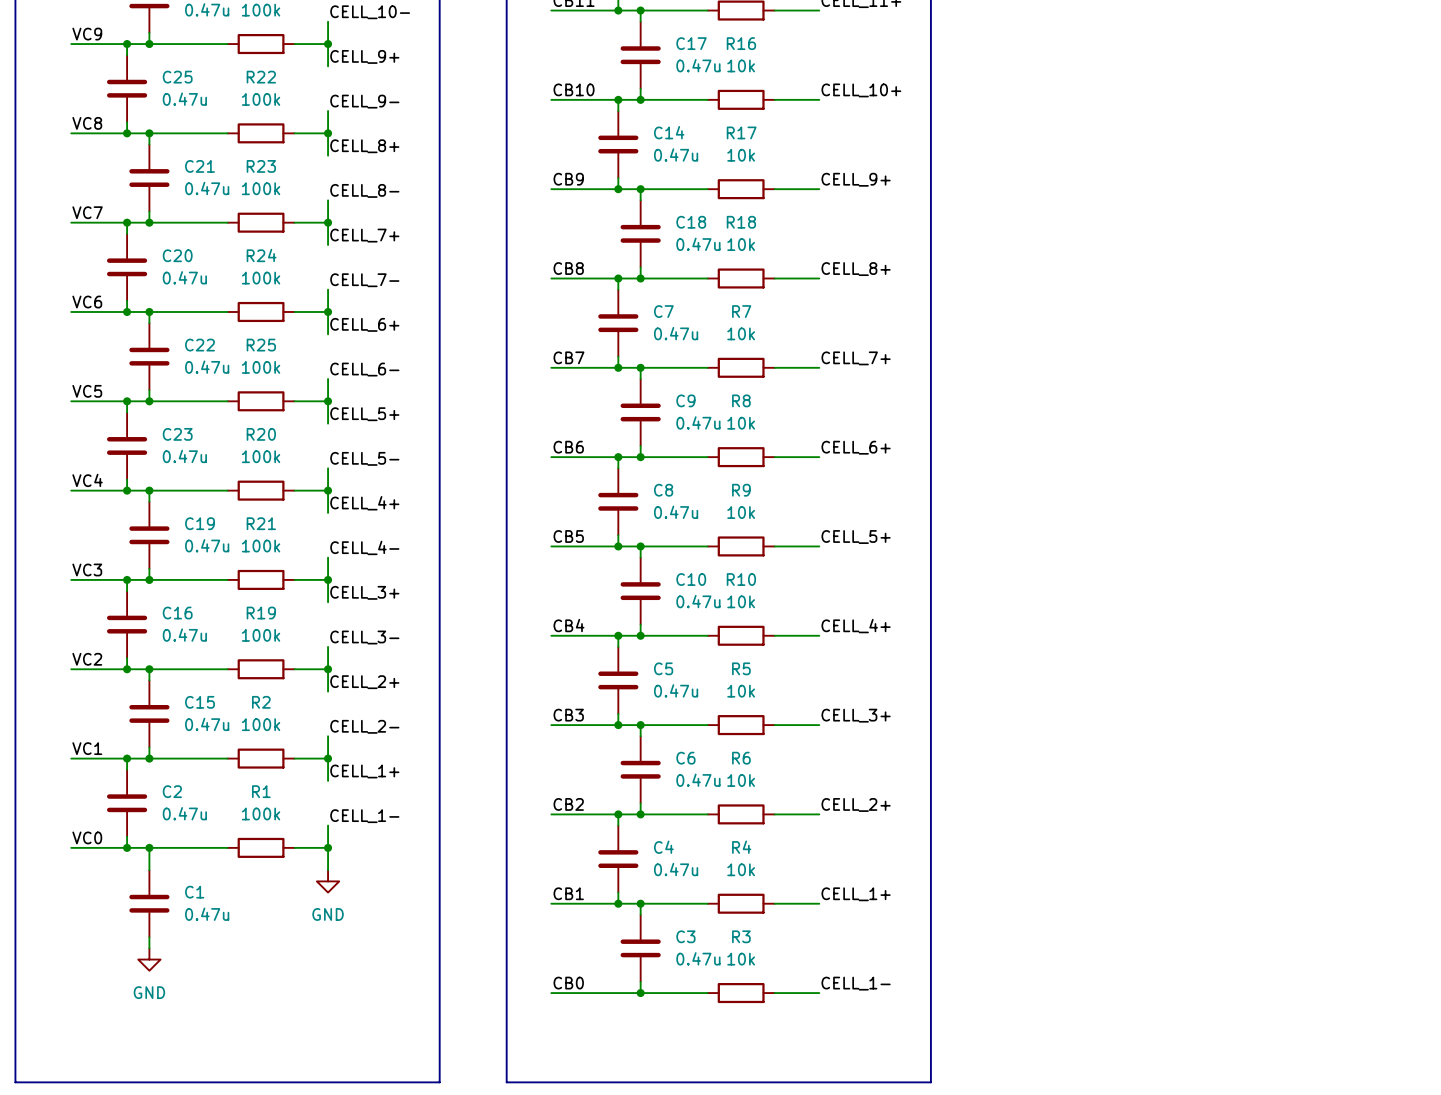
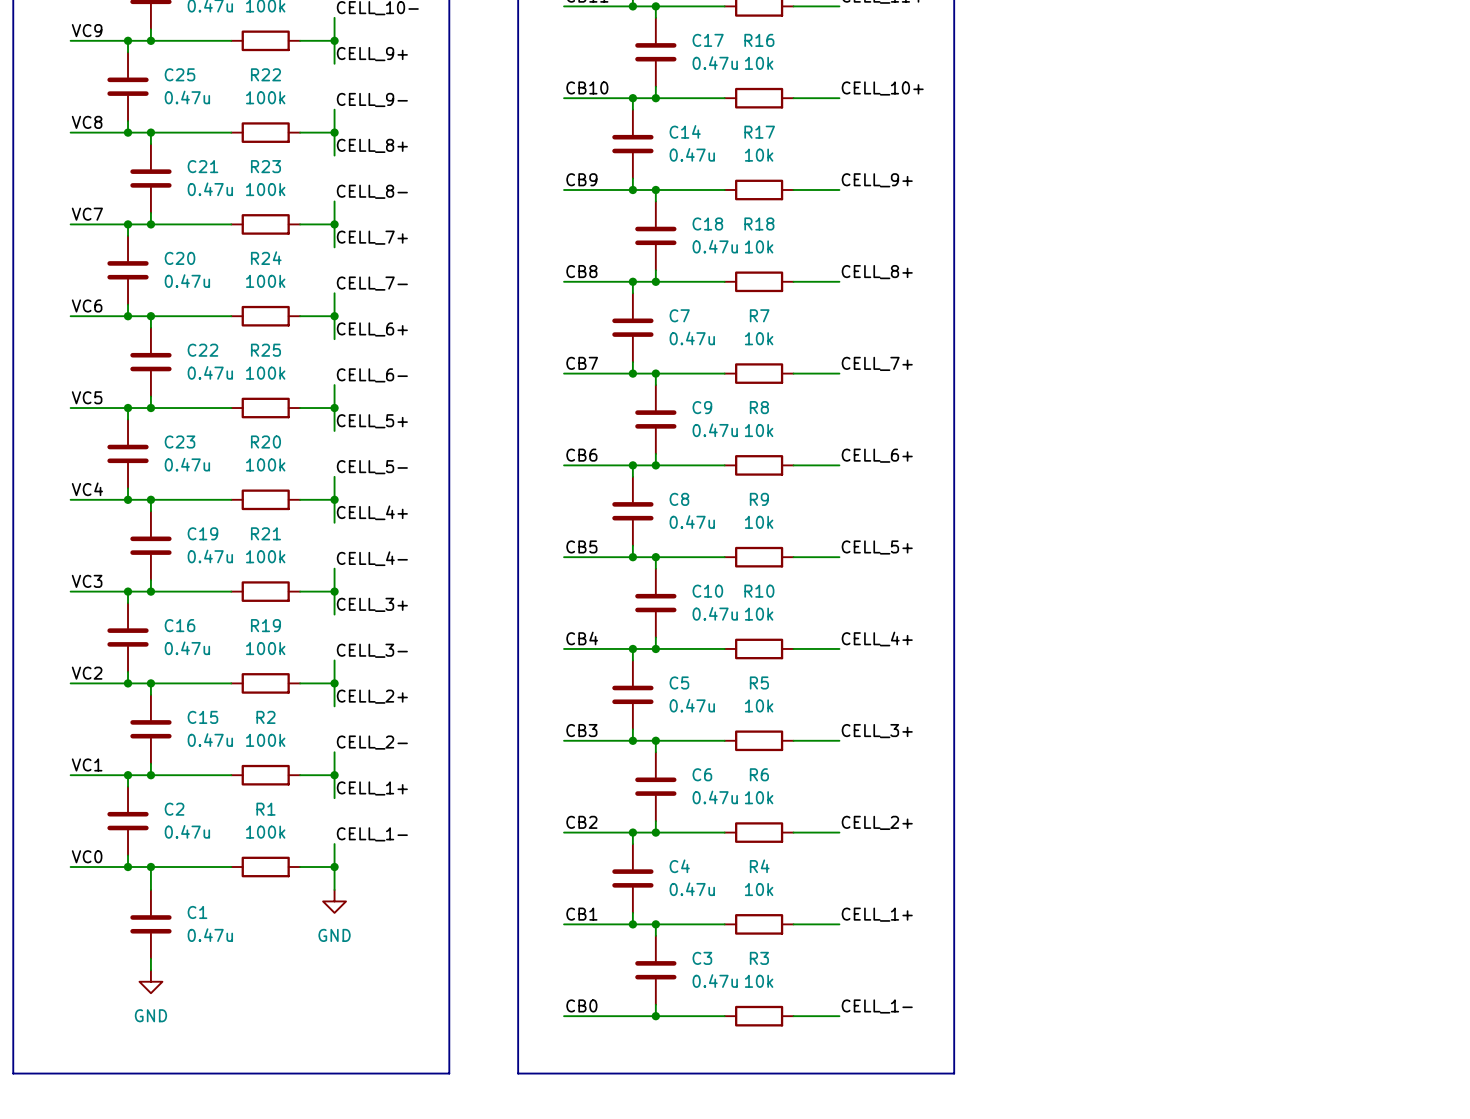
line: (15, 1048) (15, 1082) (439, 1082) (439, 1048) -> (13, 1073) (449, 1073)
line: (506, 1048) (506, 1082) (930, 1082) (930, 1048) -> (518, 1073) (954, 1073)

